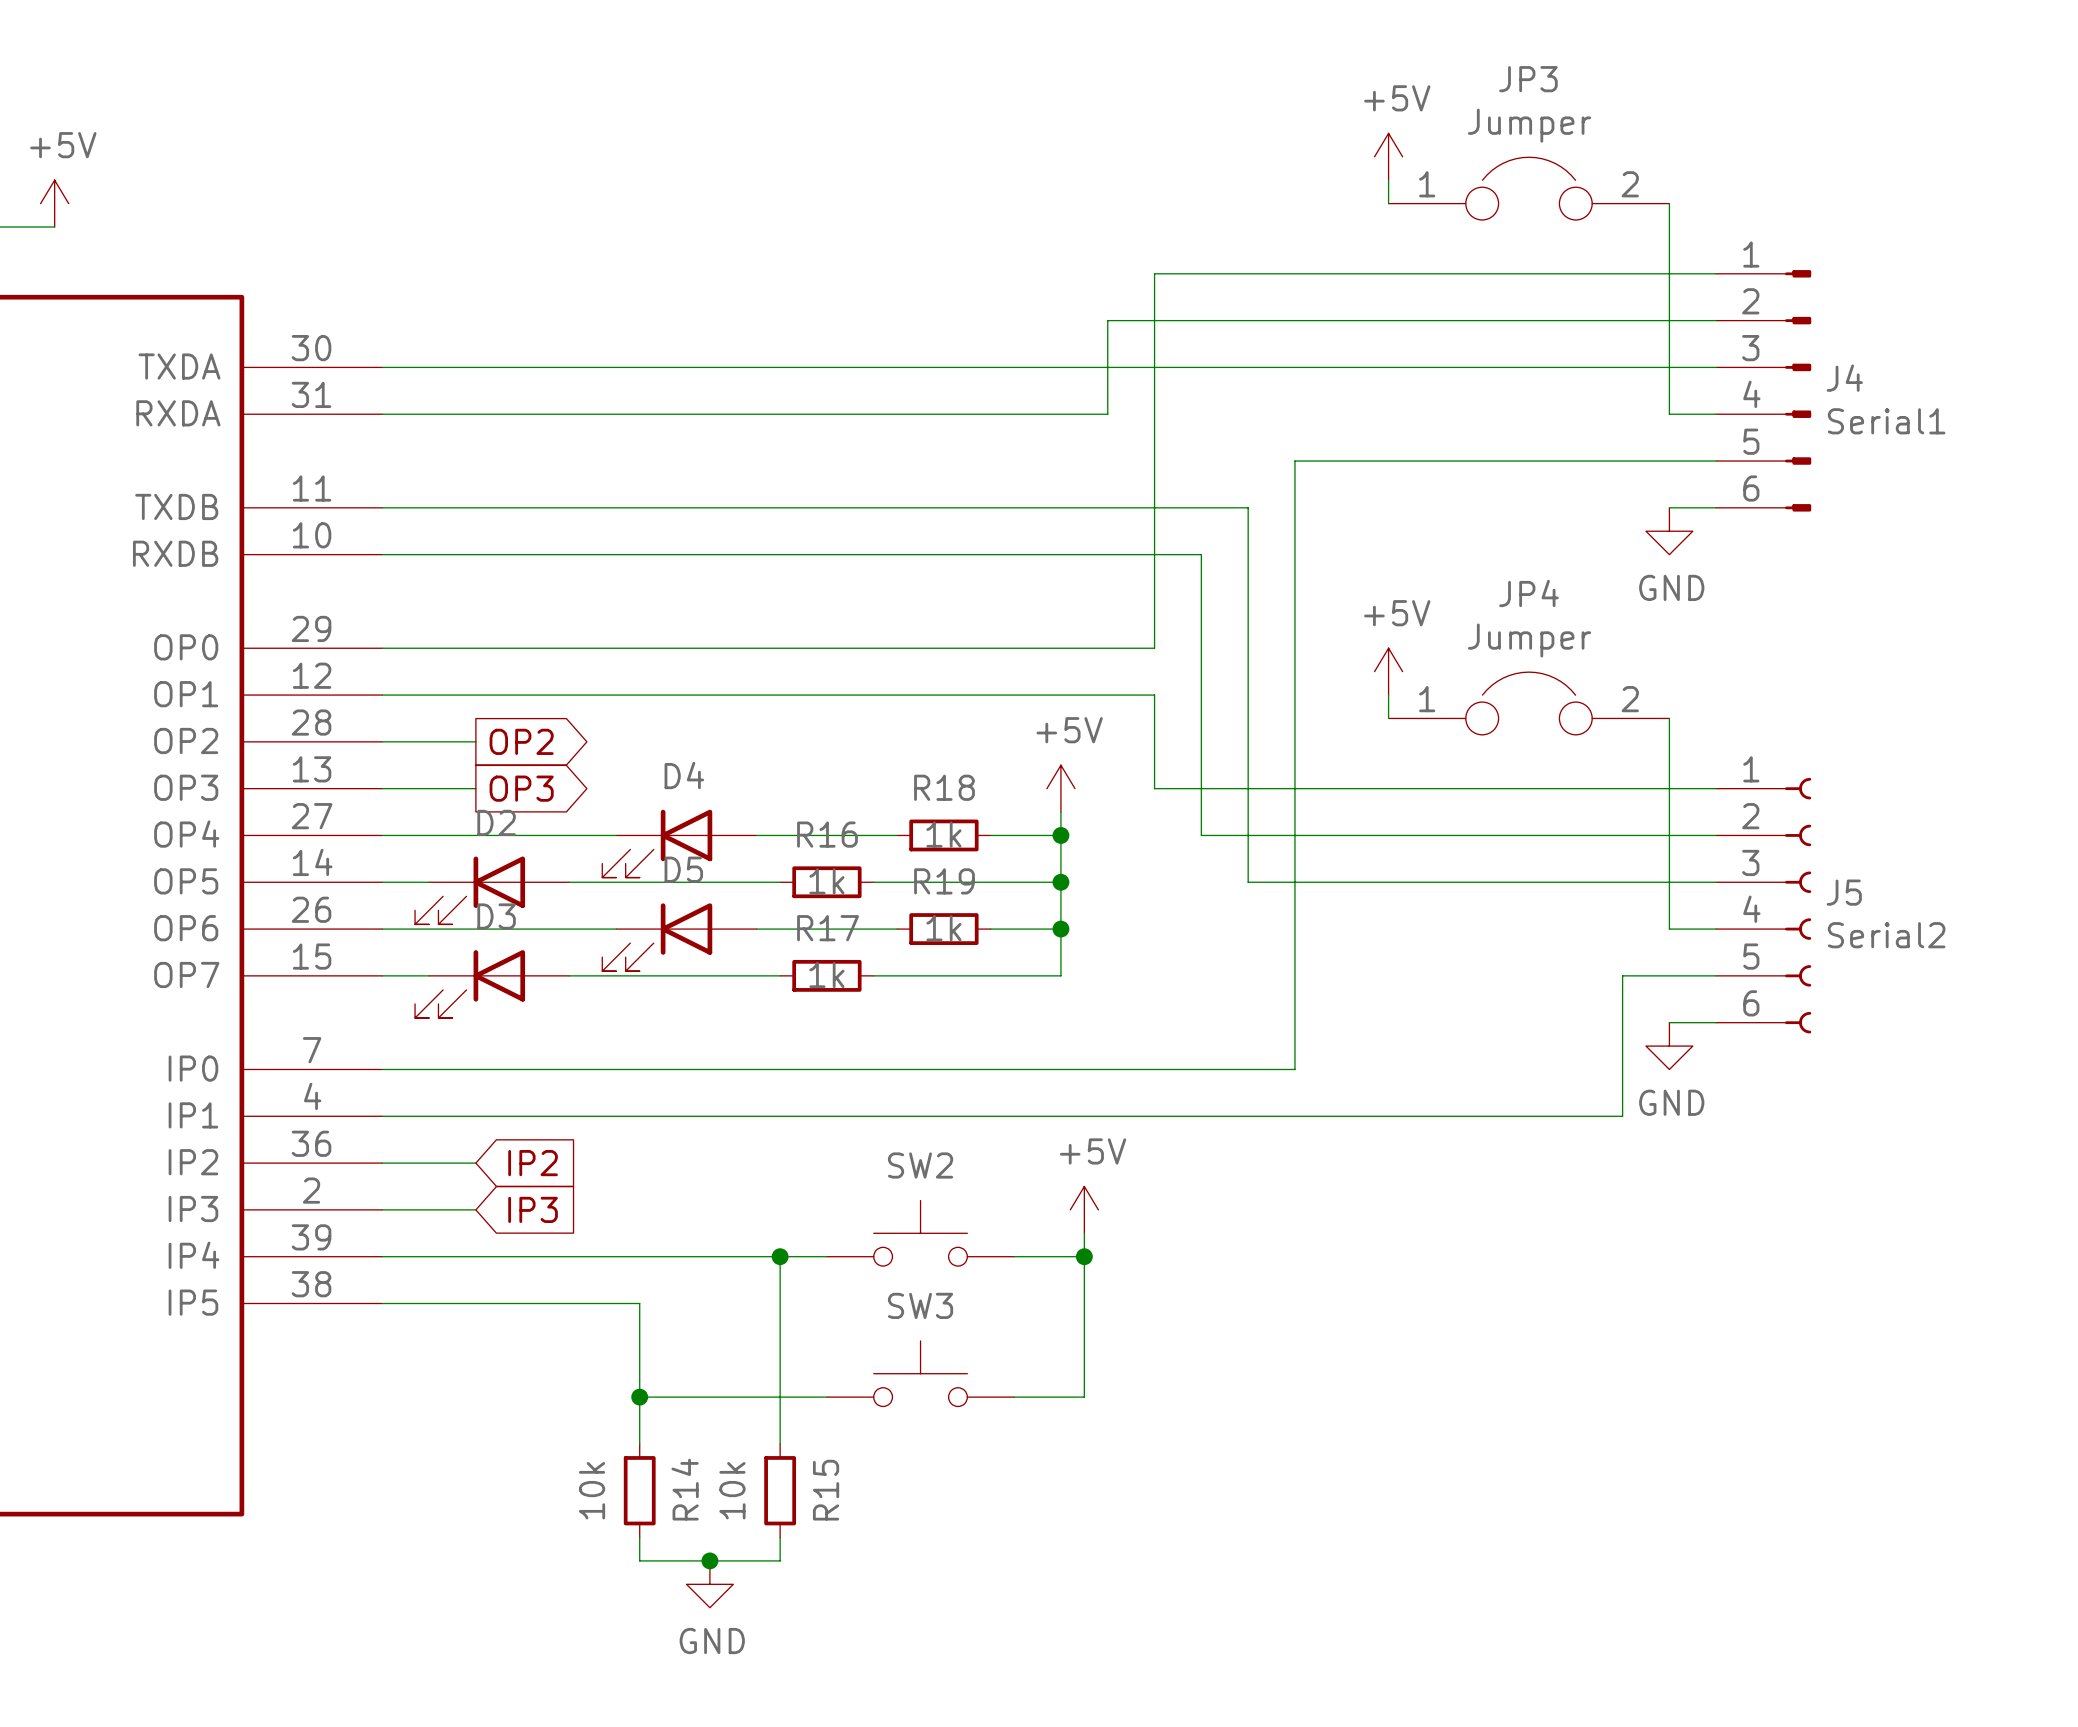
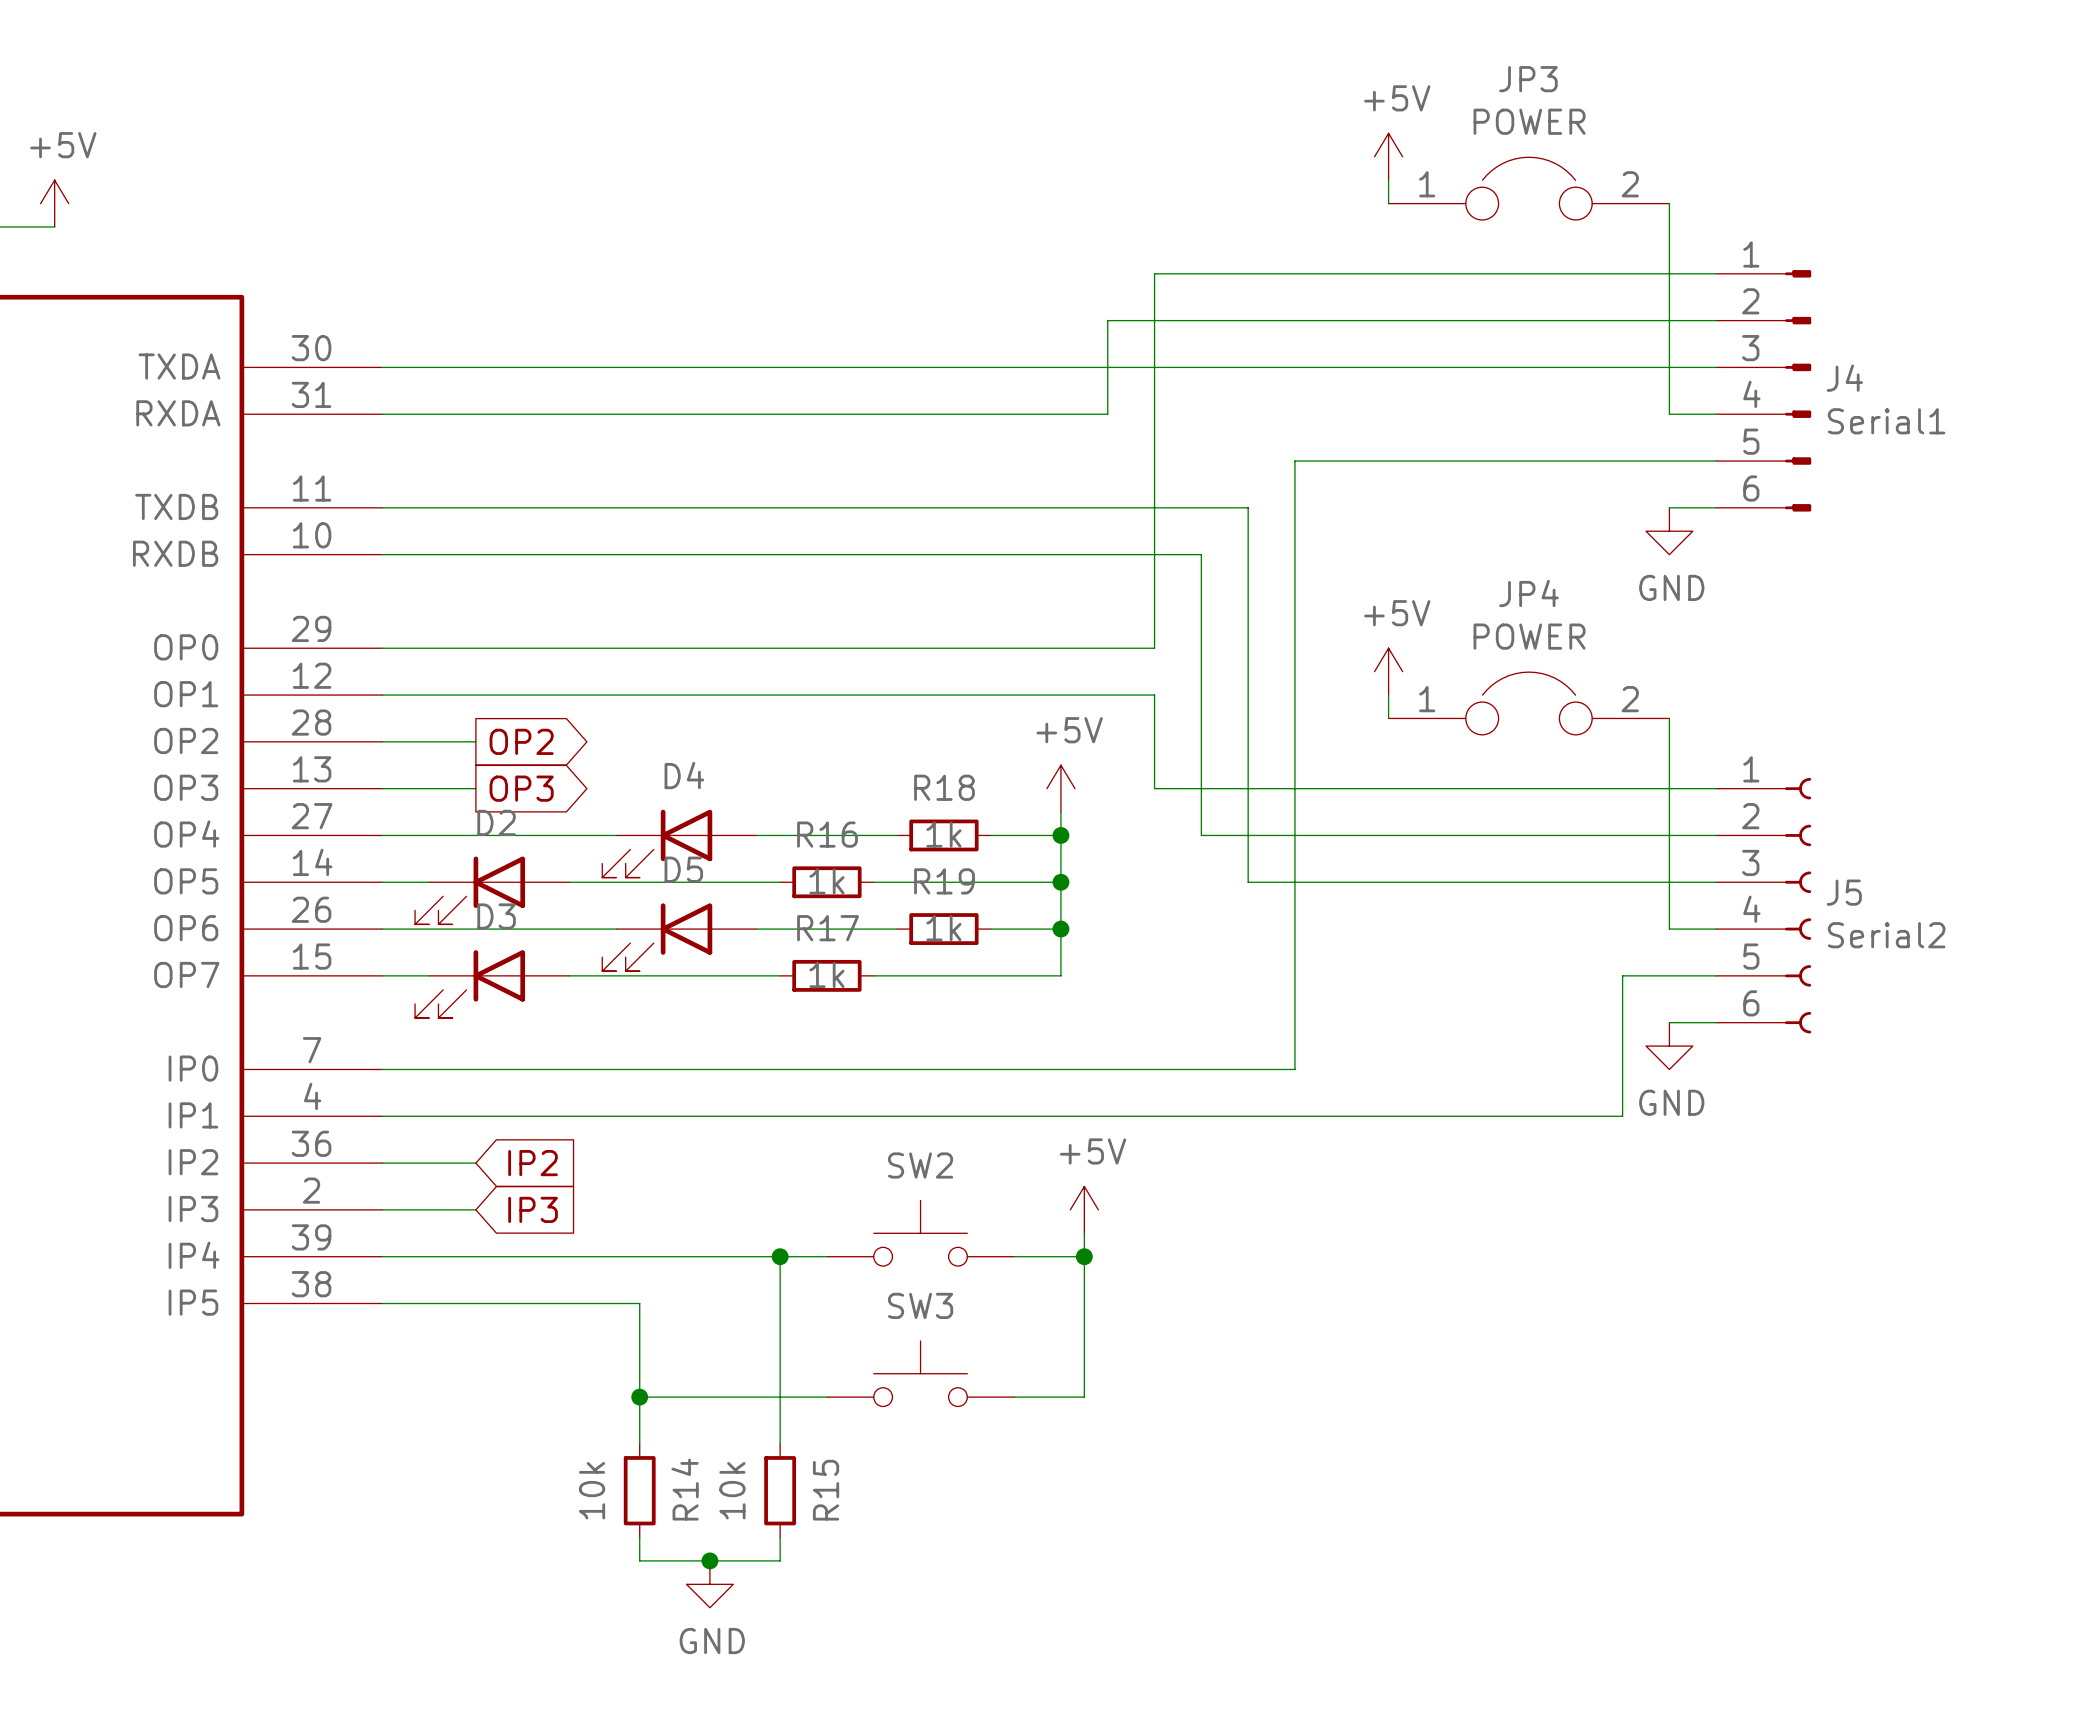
JP3 value: Jumper (1529, 125) -> POWER (1529, 121)
JP4 value: Jumper (1529, 640) -> POWER (1529, 636)

